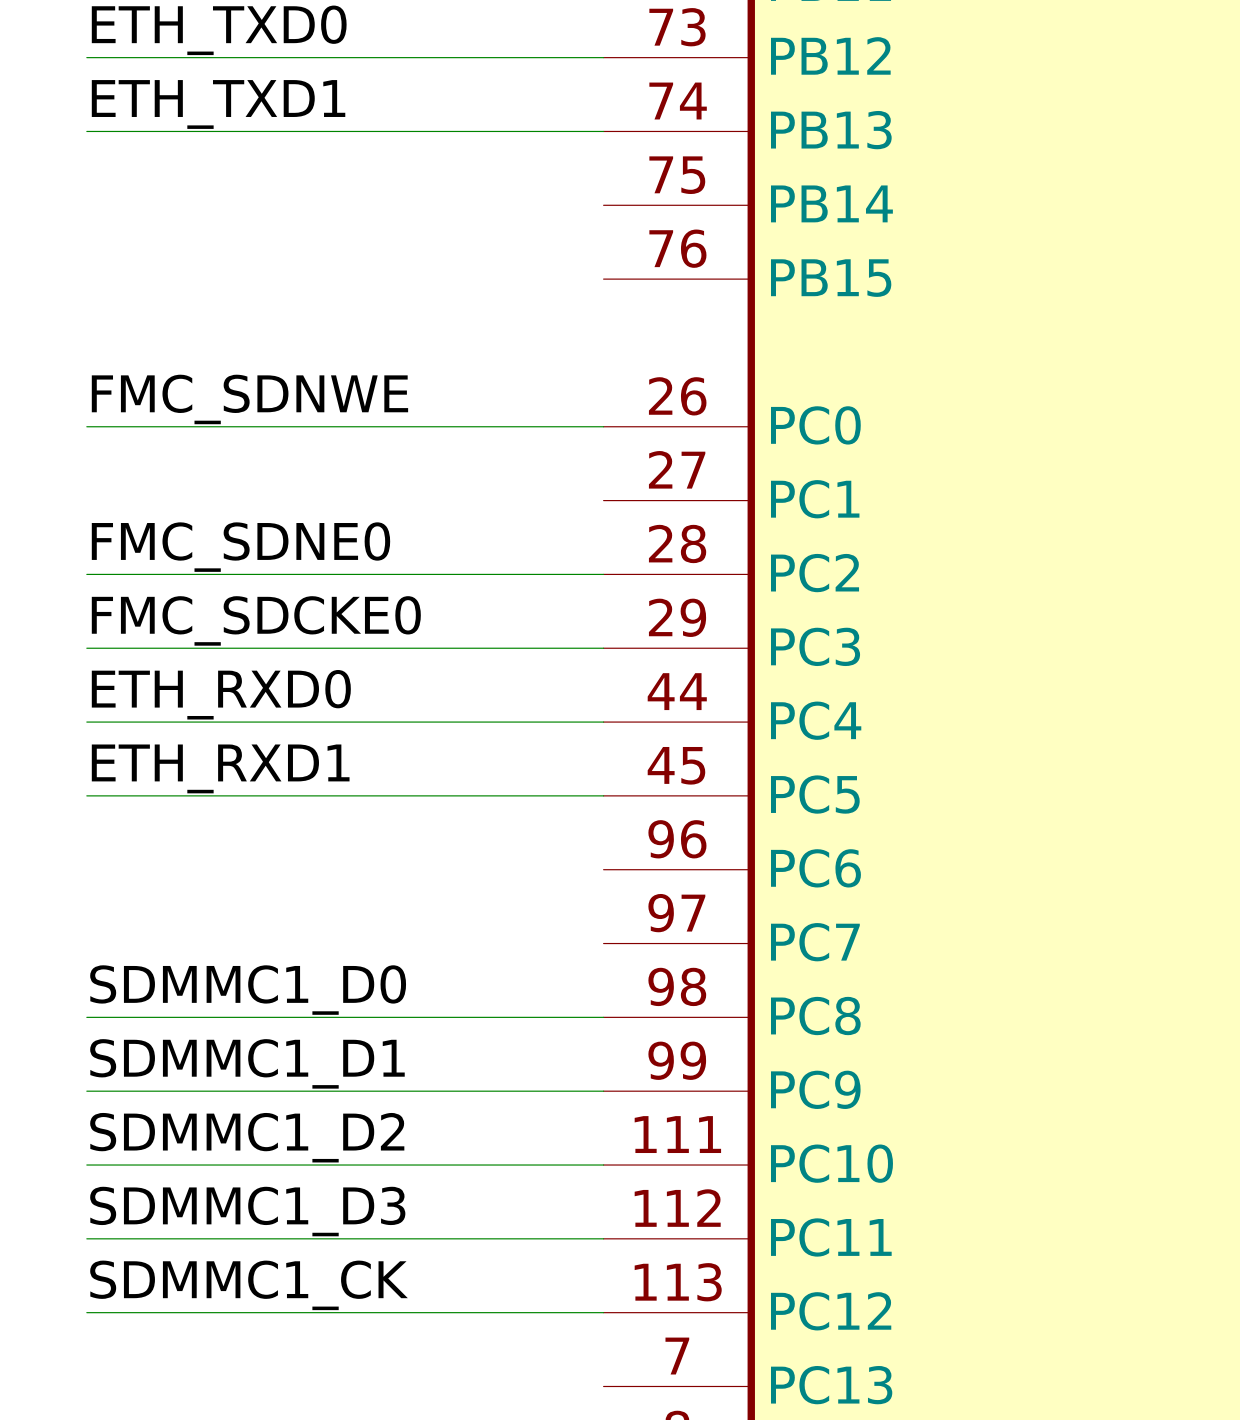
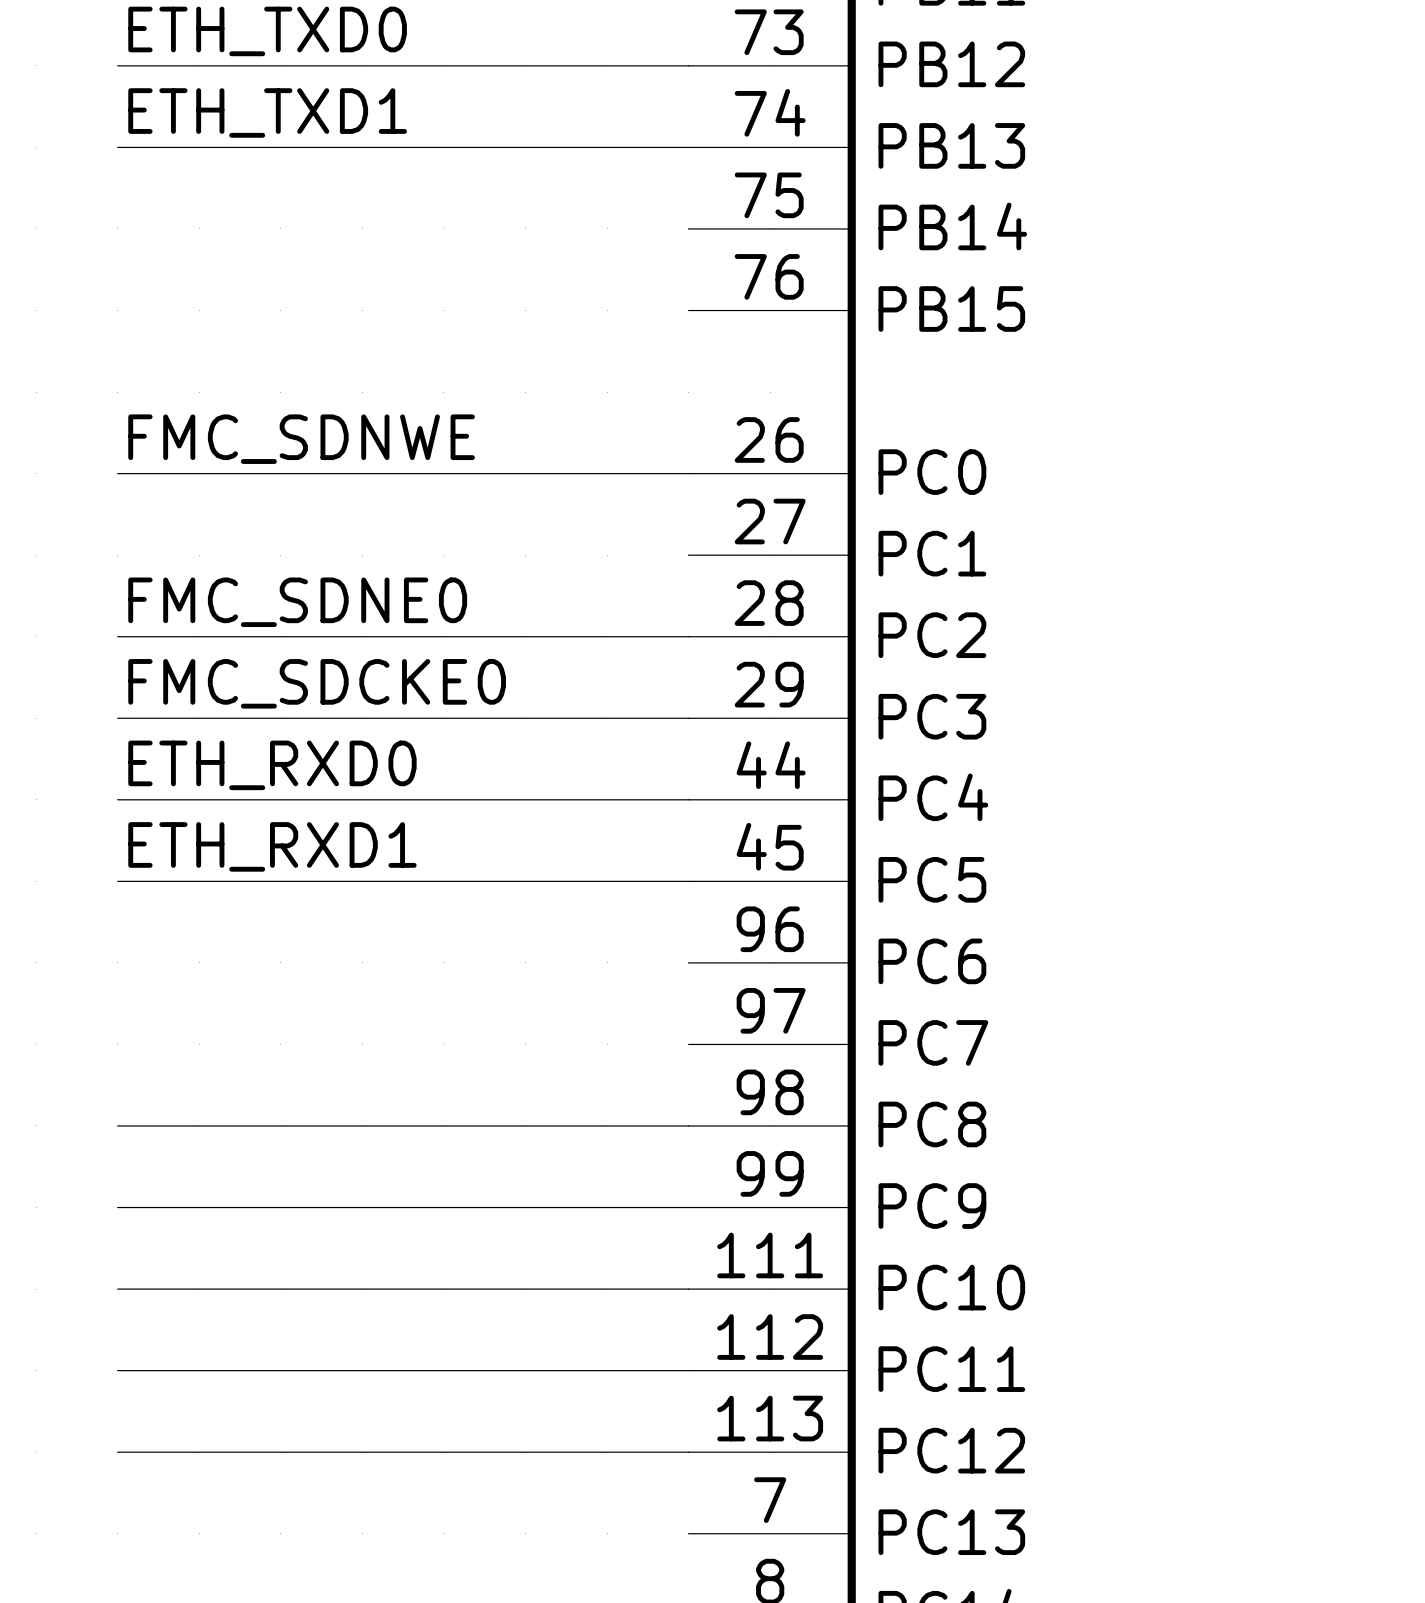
label: SDMMC1_D0 (248, 990) -> none
label: SDMMC1_D1 (247, 1063) -> none
label: SDMMC1_D2 (247, 1137) -> none
label: SDMMC1_D3 (247, 1211) -> none
label: SDMMC1_CK (249, 1285) -> none

